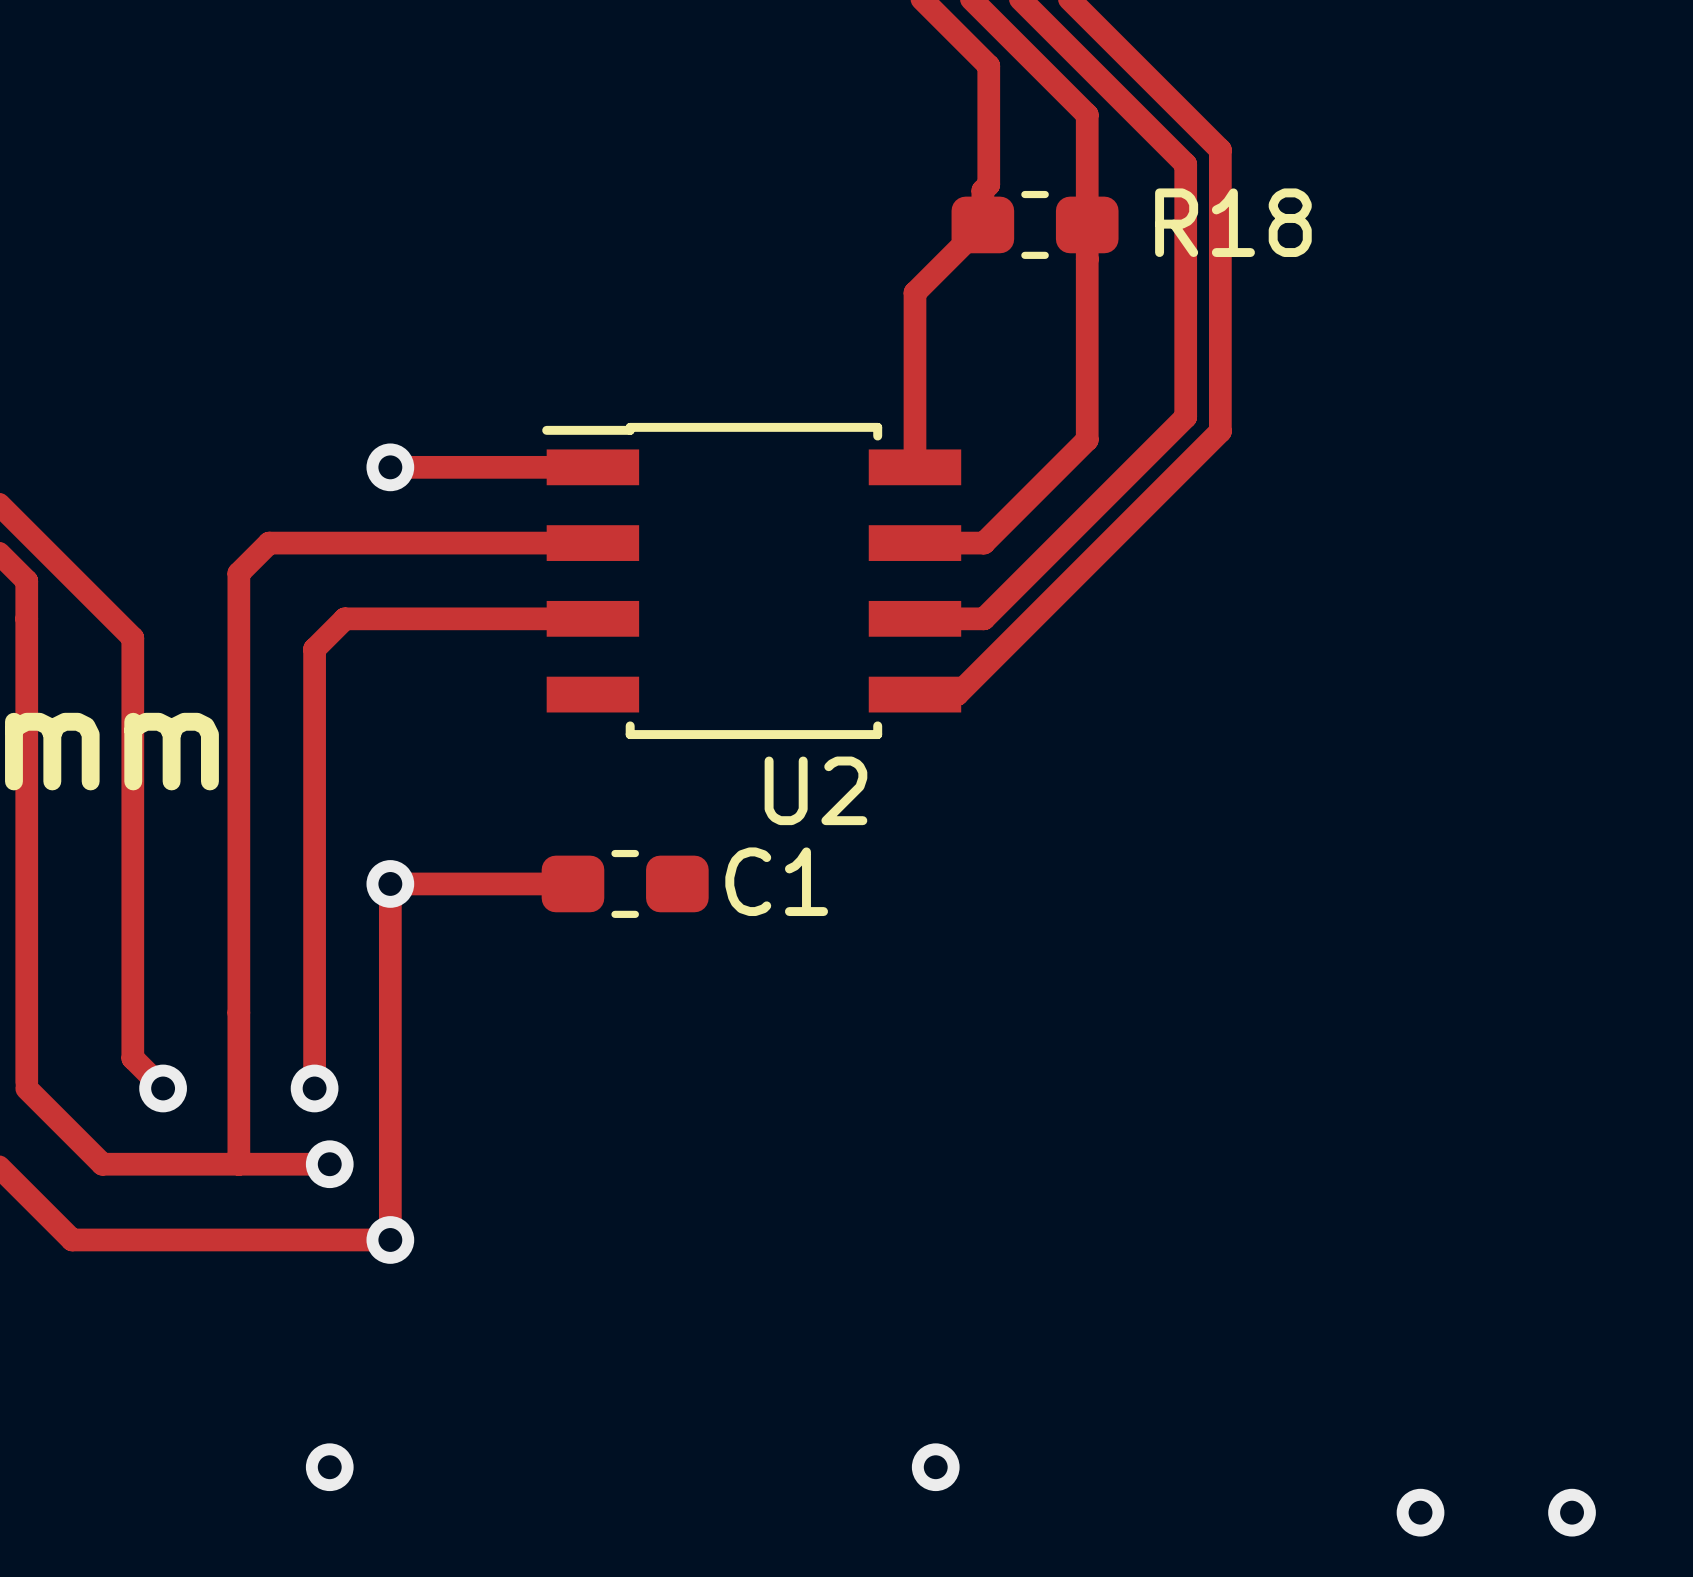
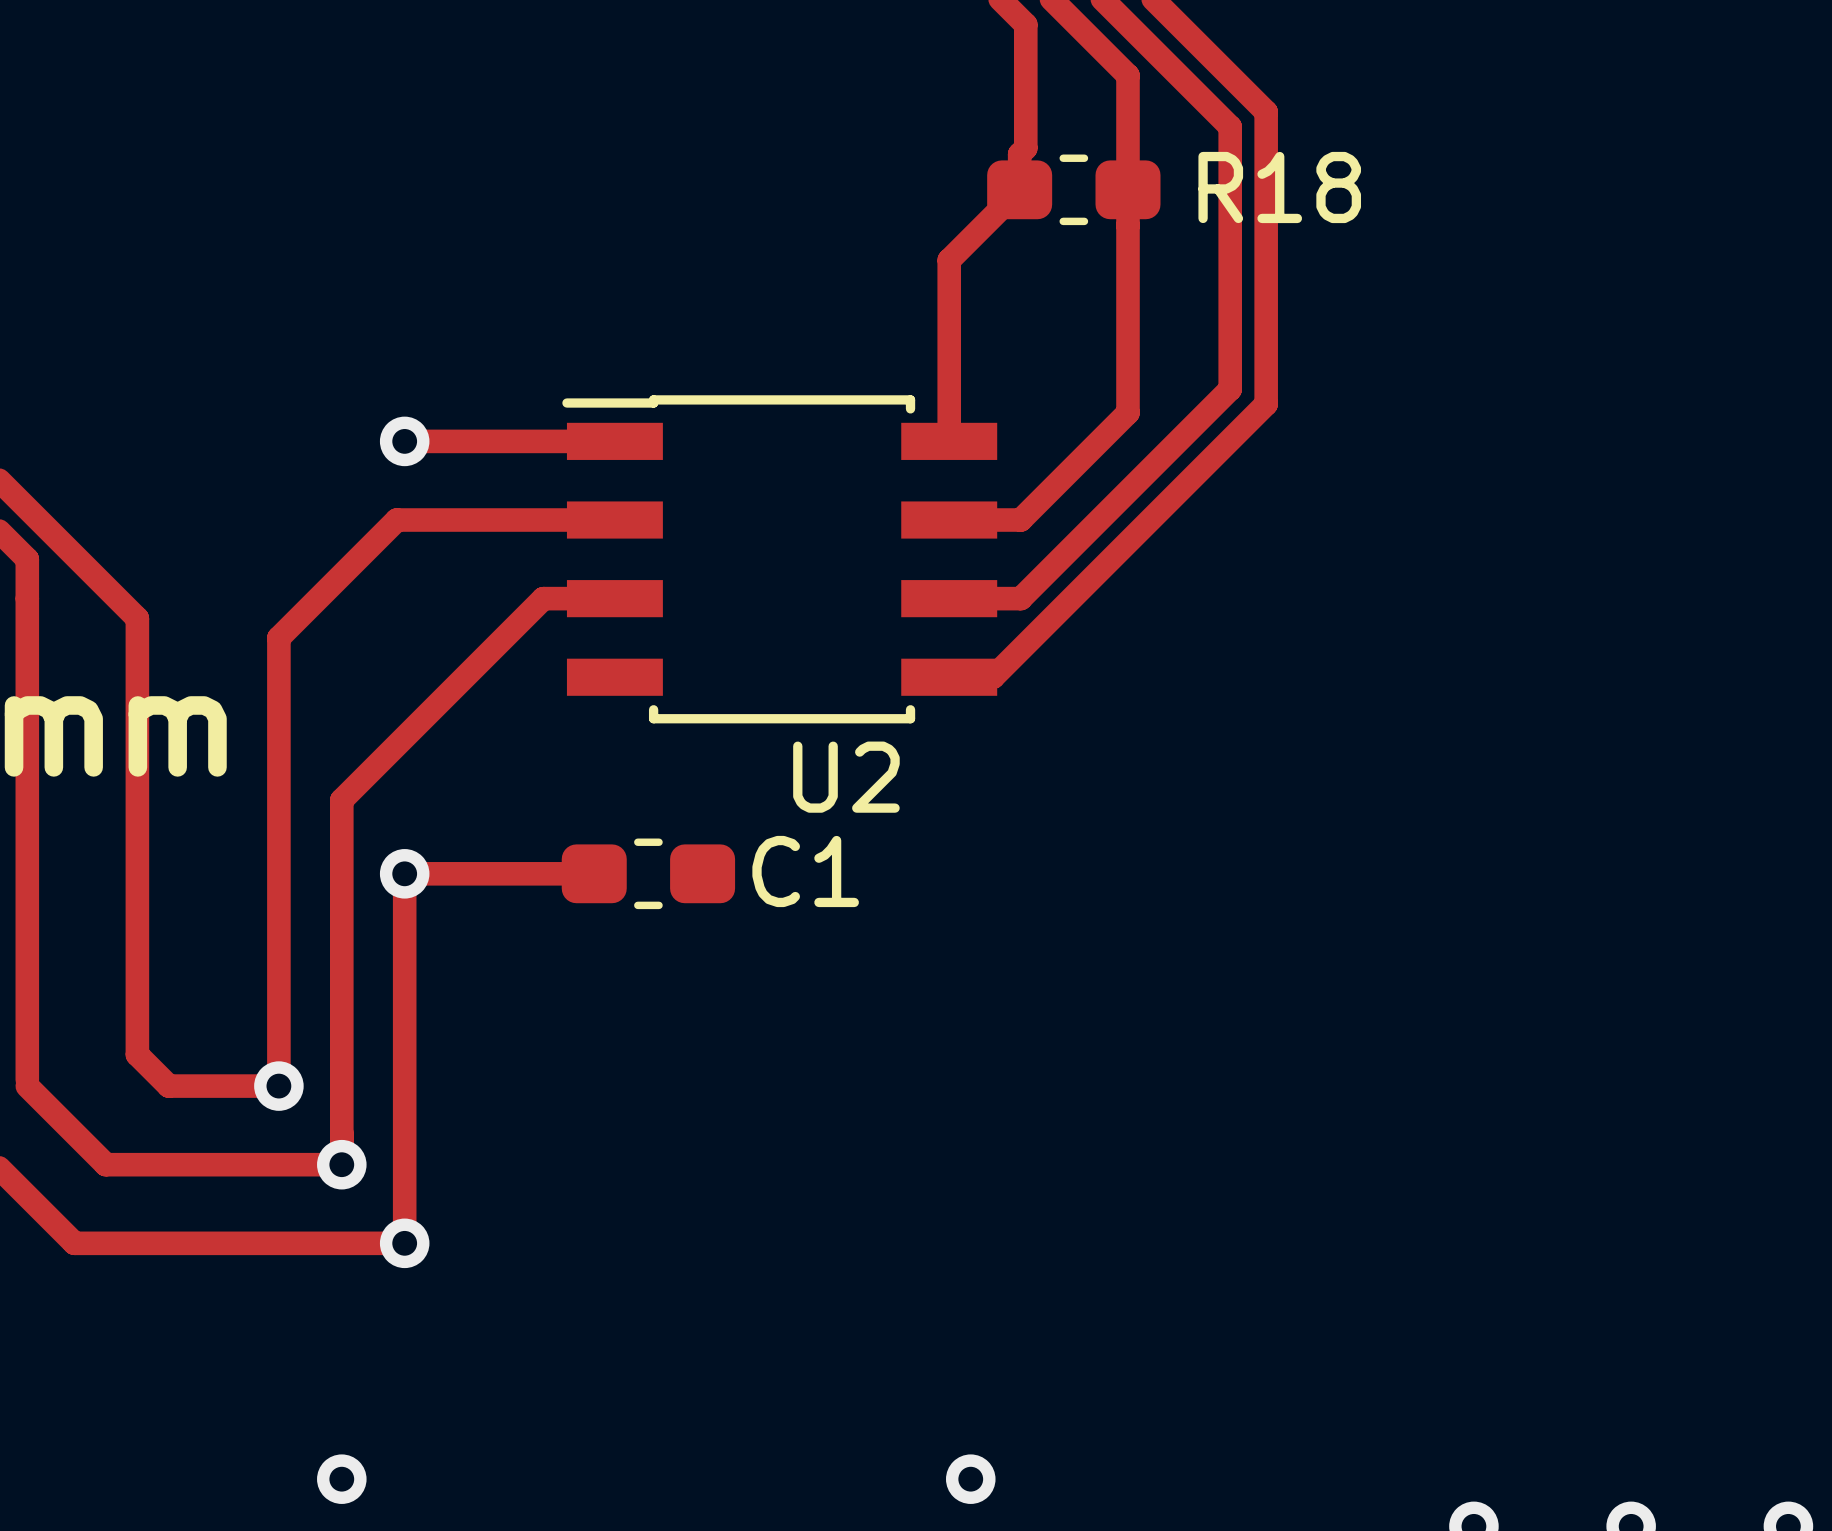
track: (382, 543) (269, 543) (238, 573) (238, 1164) -> (396, 520) (278, 637) (278, 1086) (168, 1086)
track: (523, 618) (344, 618) (314, 649) (314, 1088) -> (543, 598) (341, 800) (341, 1164)
via: (163, 1088) -> none
via position: (314, 1088) -> (278, 1086)

